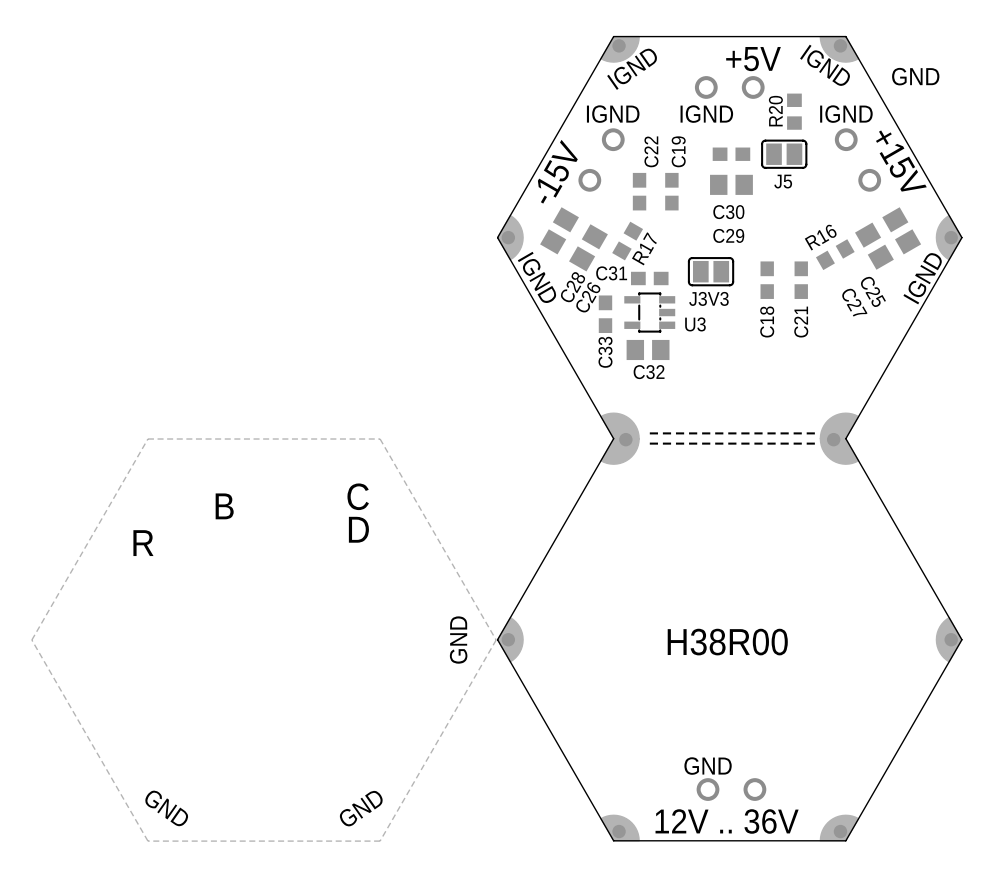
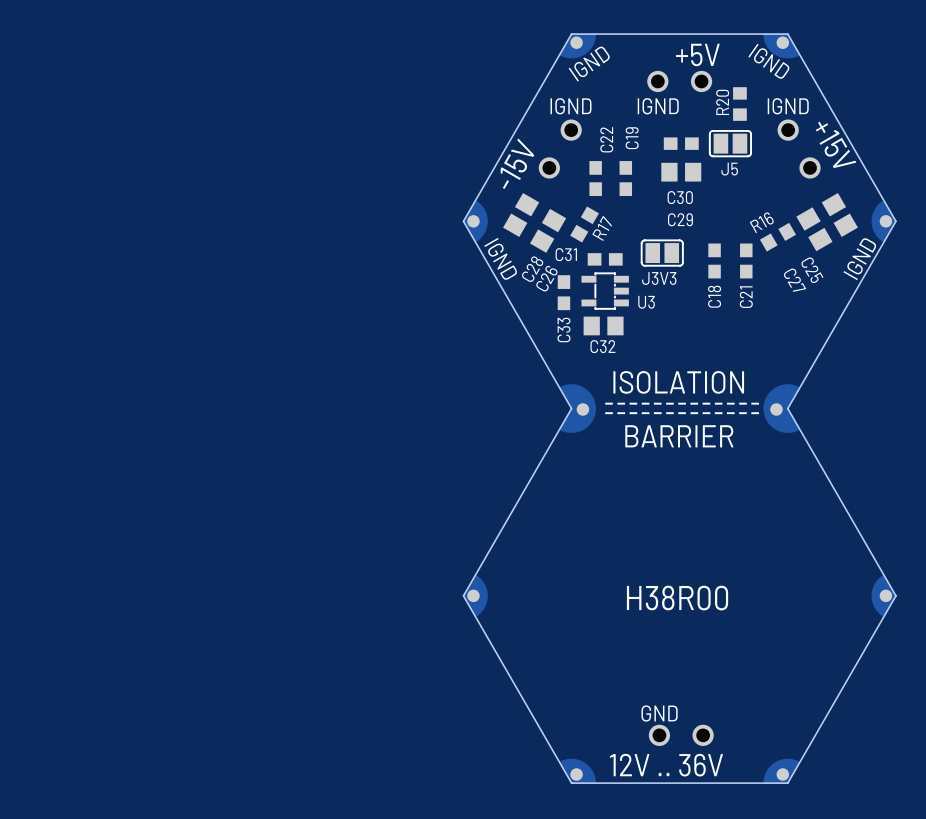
text: GND (915, 76) -> none
text: none -> ISOLATION (678, 382)
zone outline: (380, 439) (147, 439) (31, 640) (147, 841) (380, 841) (496, 640) (380, 439) -> none
text: none -> BARRIER (679, 436)
text: C (358, 496) -> none
text: B (224, 506) -> none
text: D (358, 529) -> none
text: R (143, 543) -> none
text: GND (458, 640) -> none
text: GND (166, 808) -> none
text: GND (361, 808) -> none

